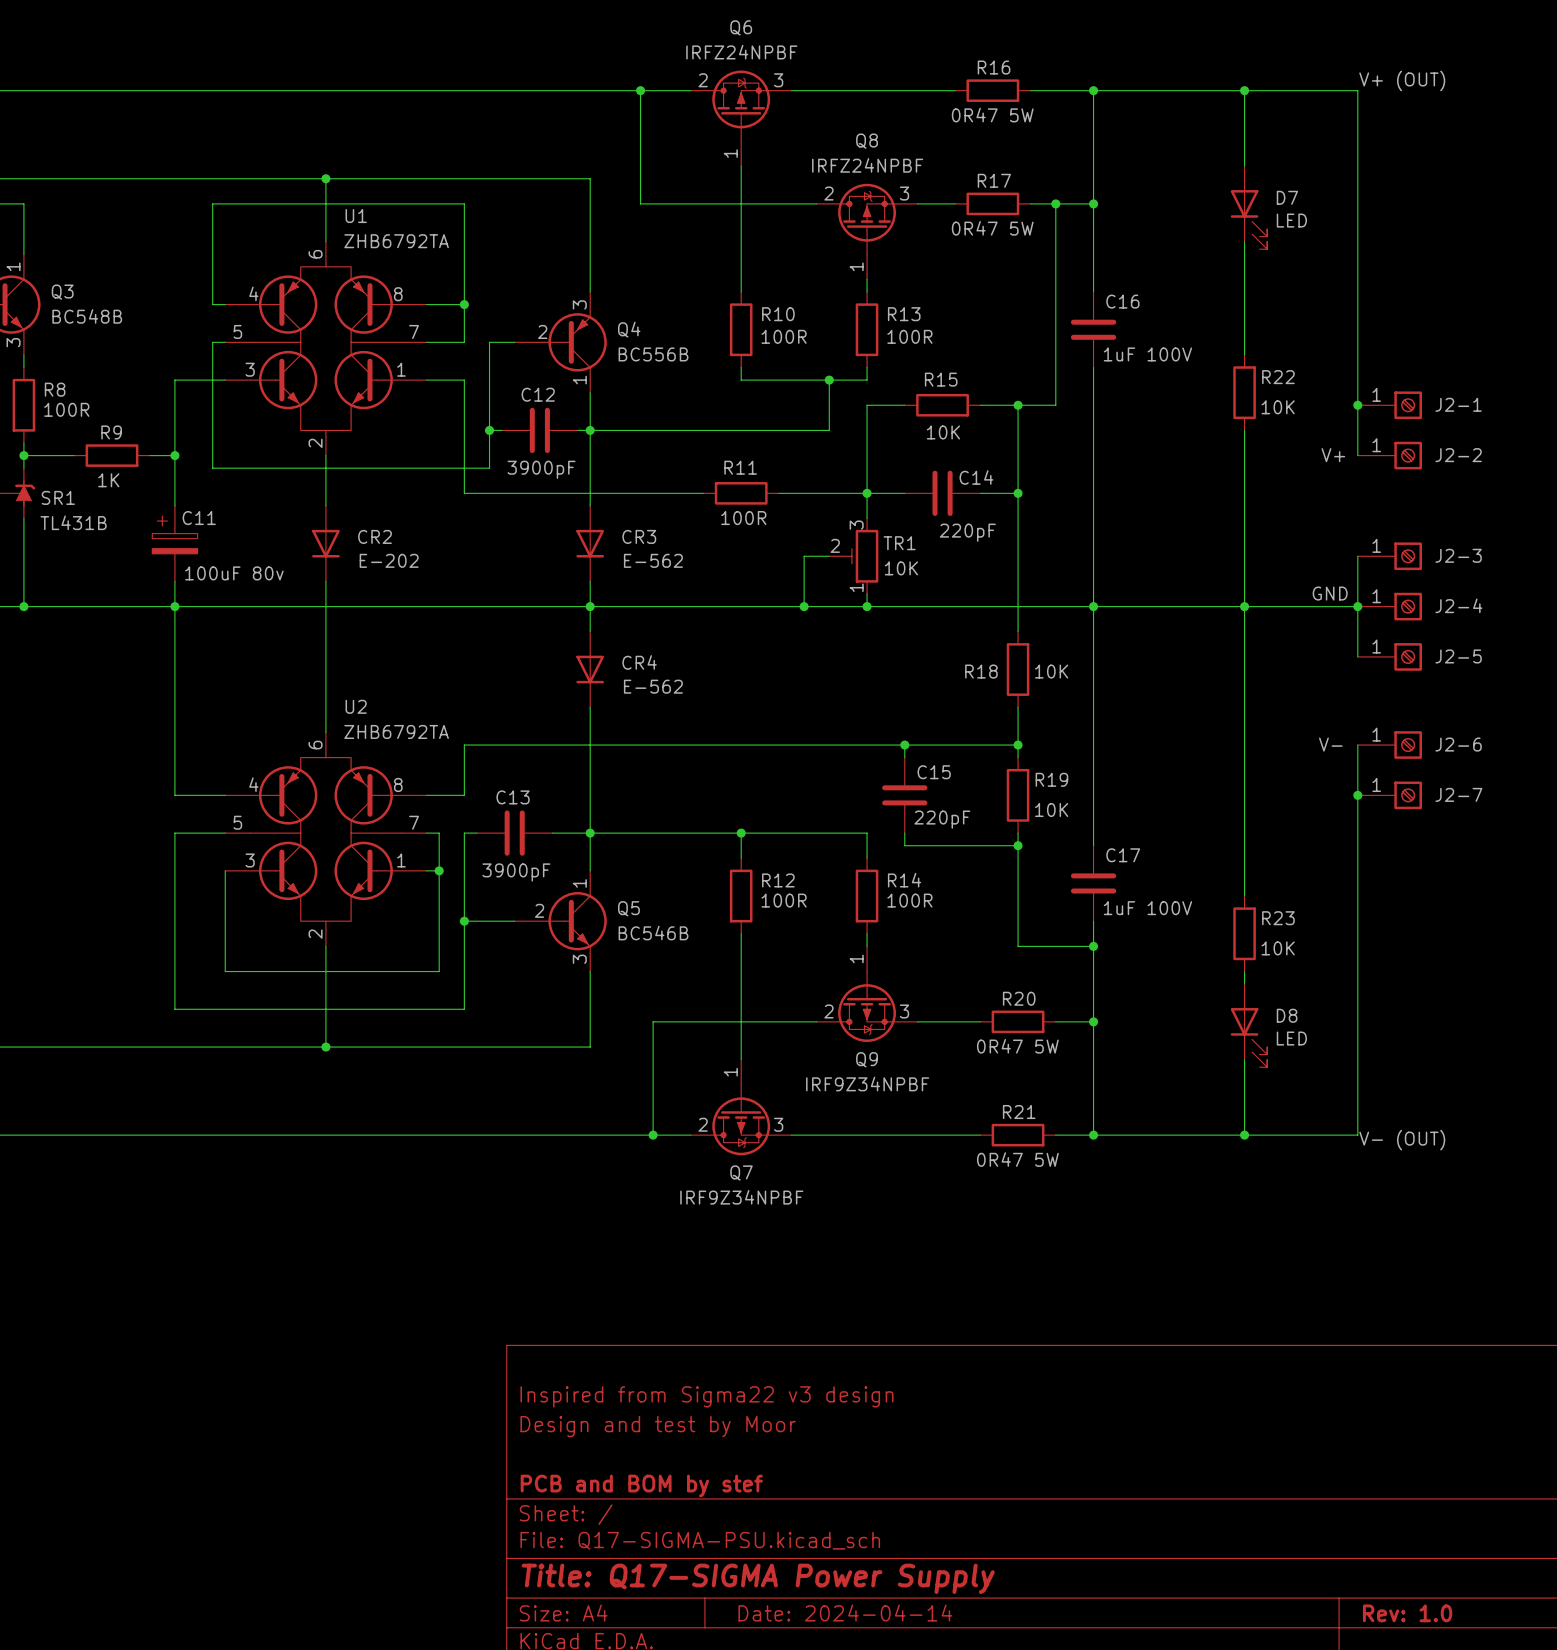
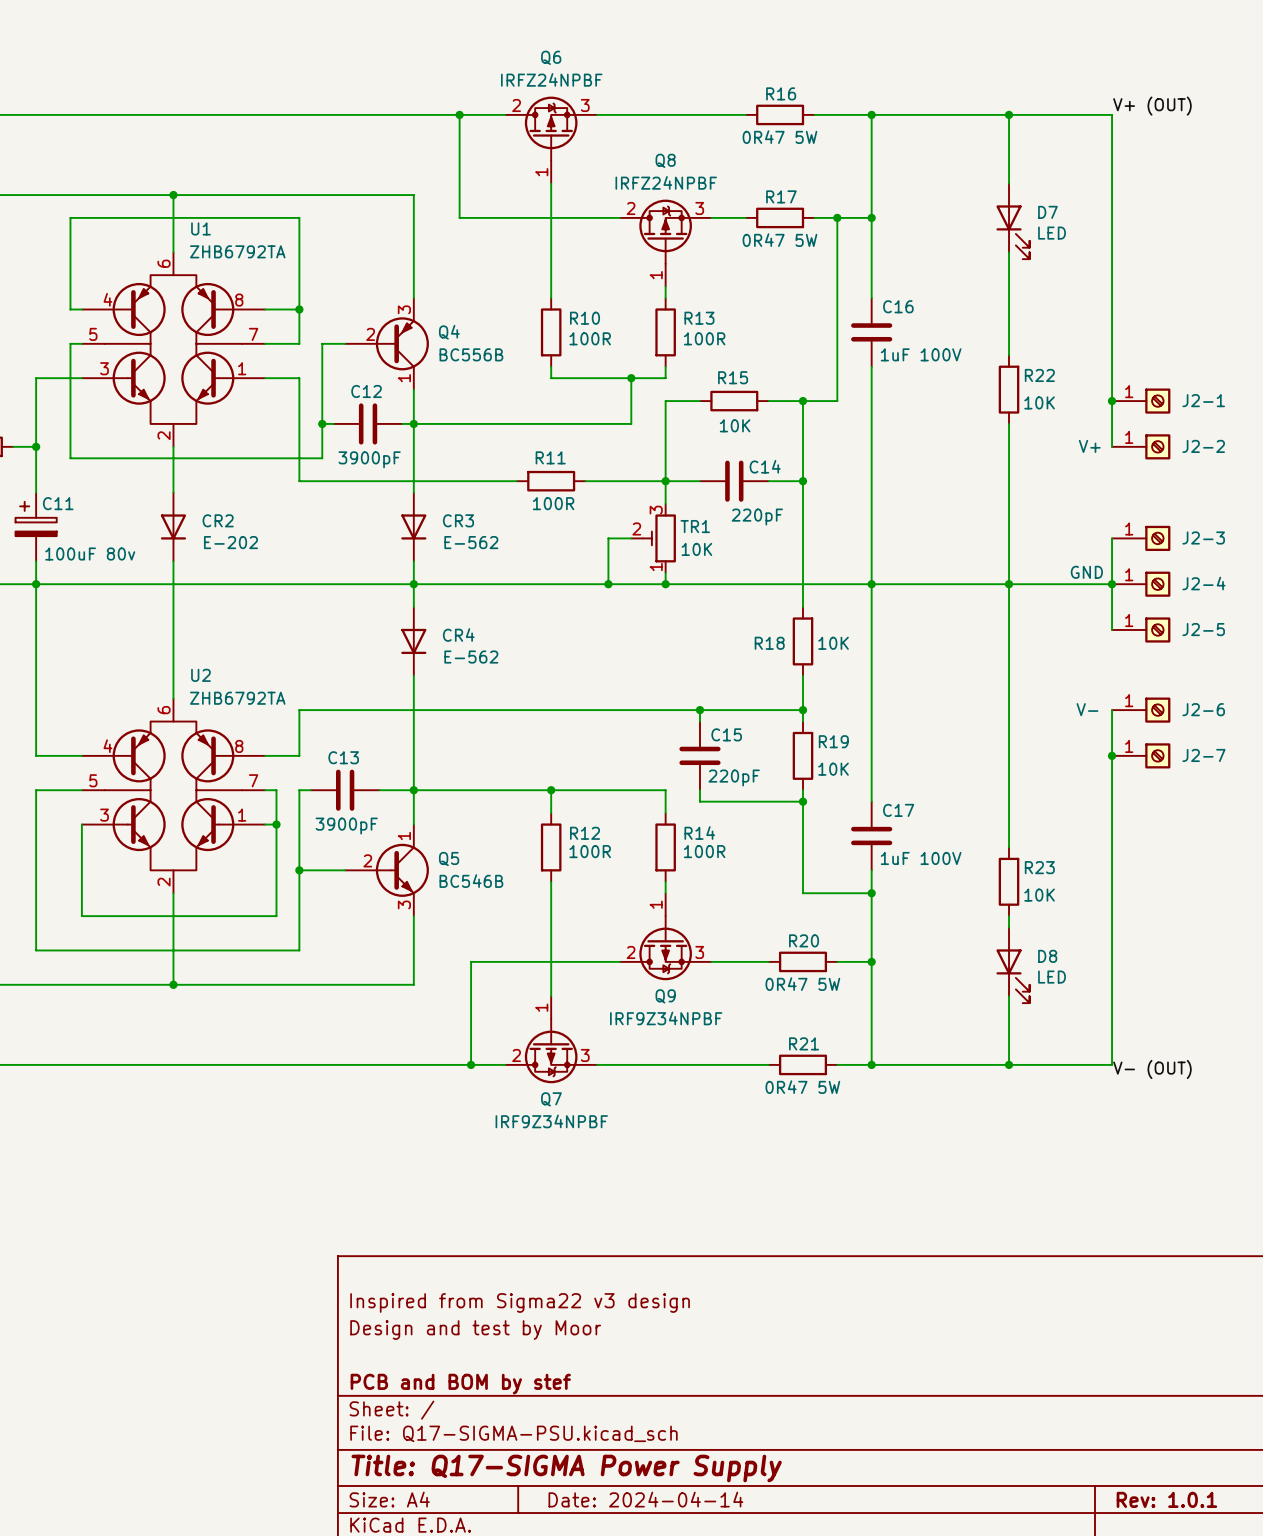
title block: Rev: 1.0 (1407, 1613) -> Rev: 1.0.1 (1166, 1499)

